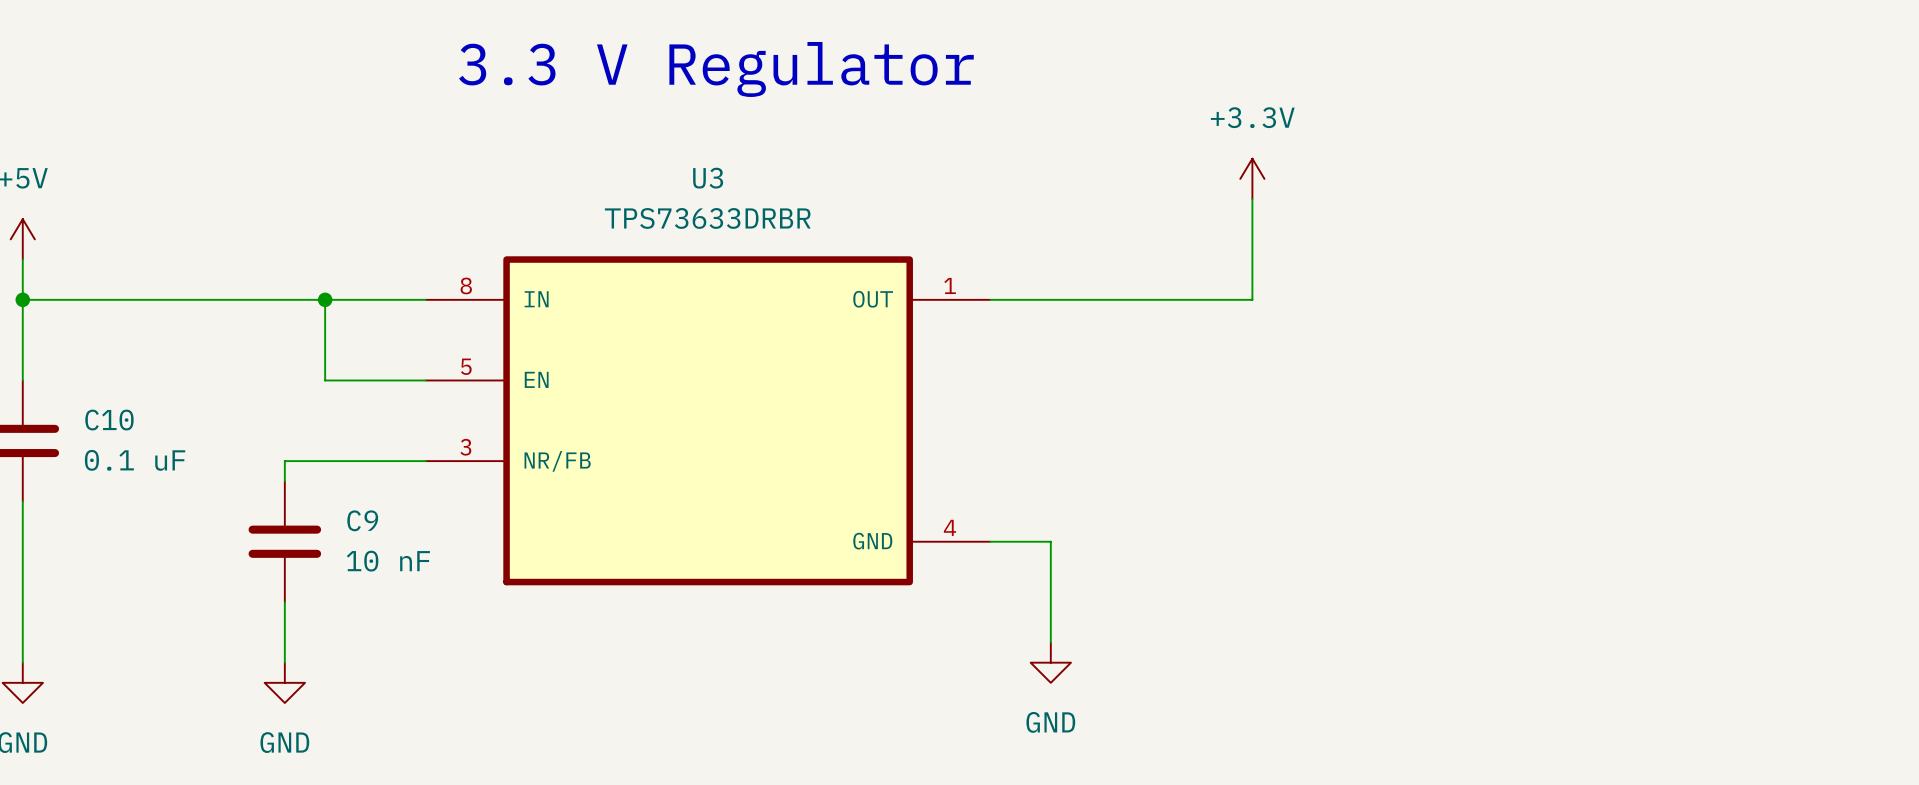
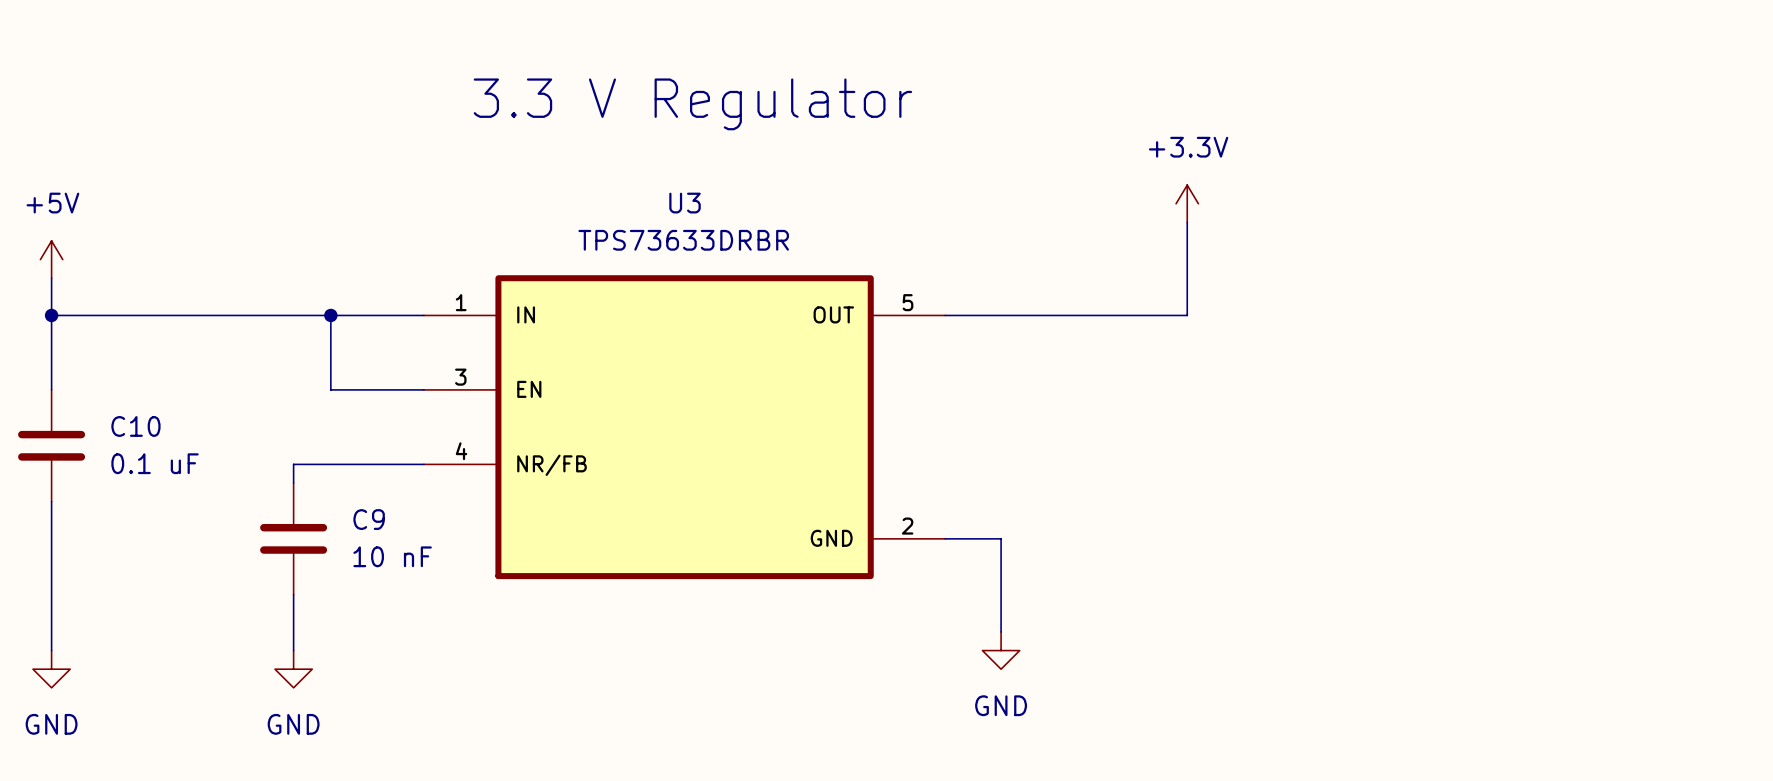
U3 pin number: 8 (466, 285) -> 1 (461, 302)
U3 pin number: 1 (950, 285) -> 5 (907, 302)
U3 pin number: 5 (466, 366) -> 3 (460, 377)
U3 pin number: 3 (465, 447) -> 4 (461, 451)
U3 pin number: 4 (949, 527) -> 2 (907, 526)

